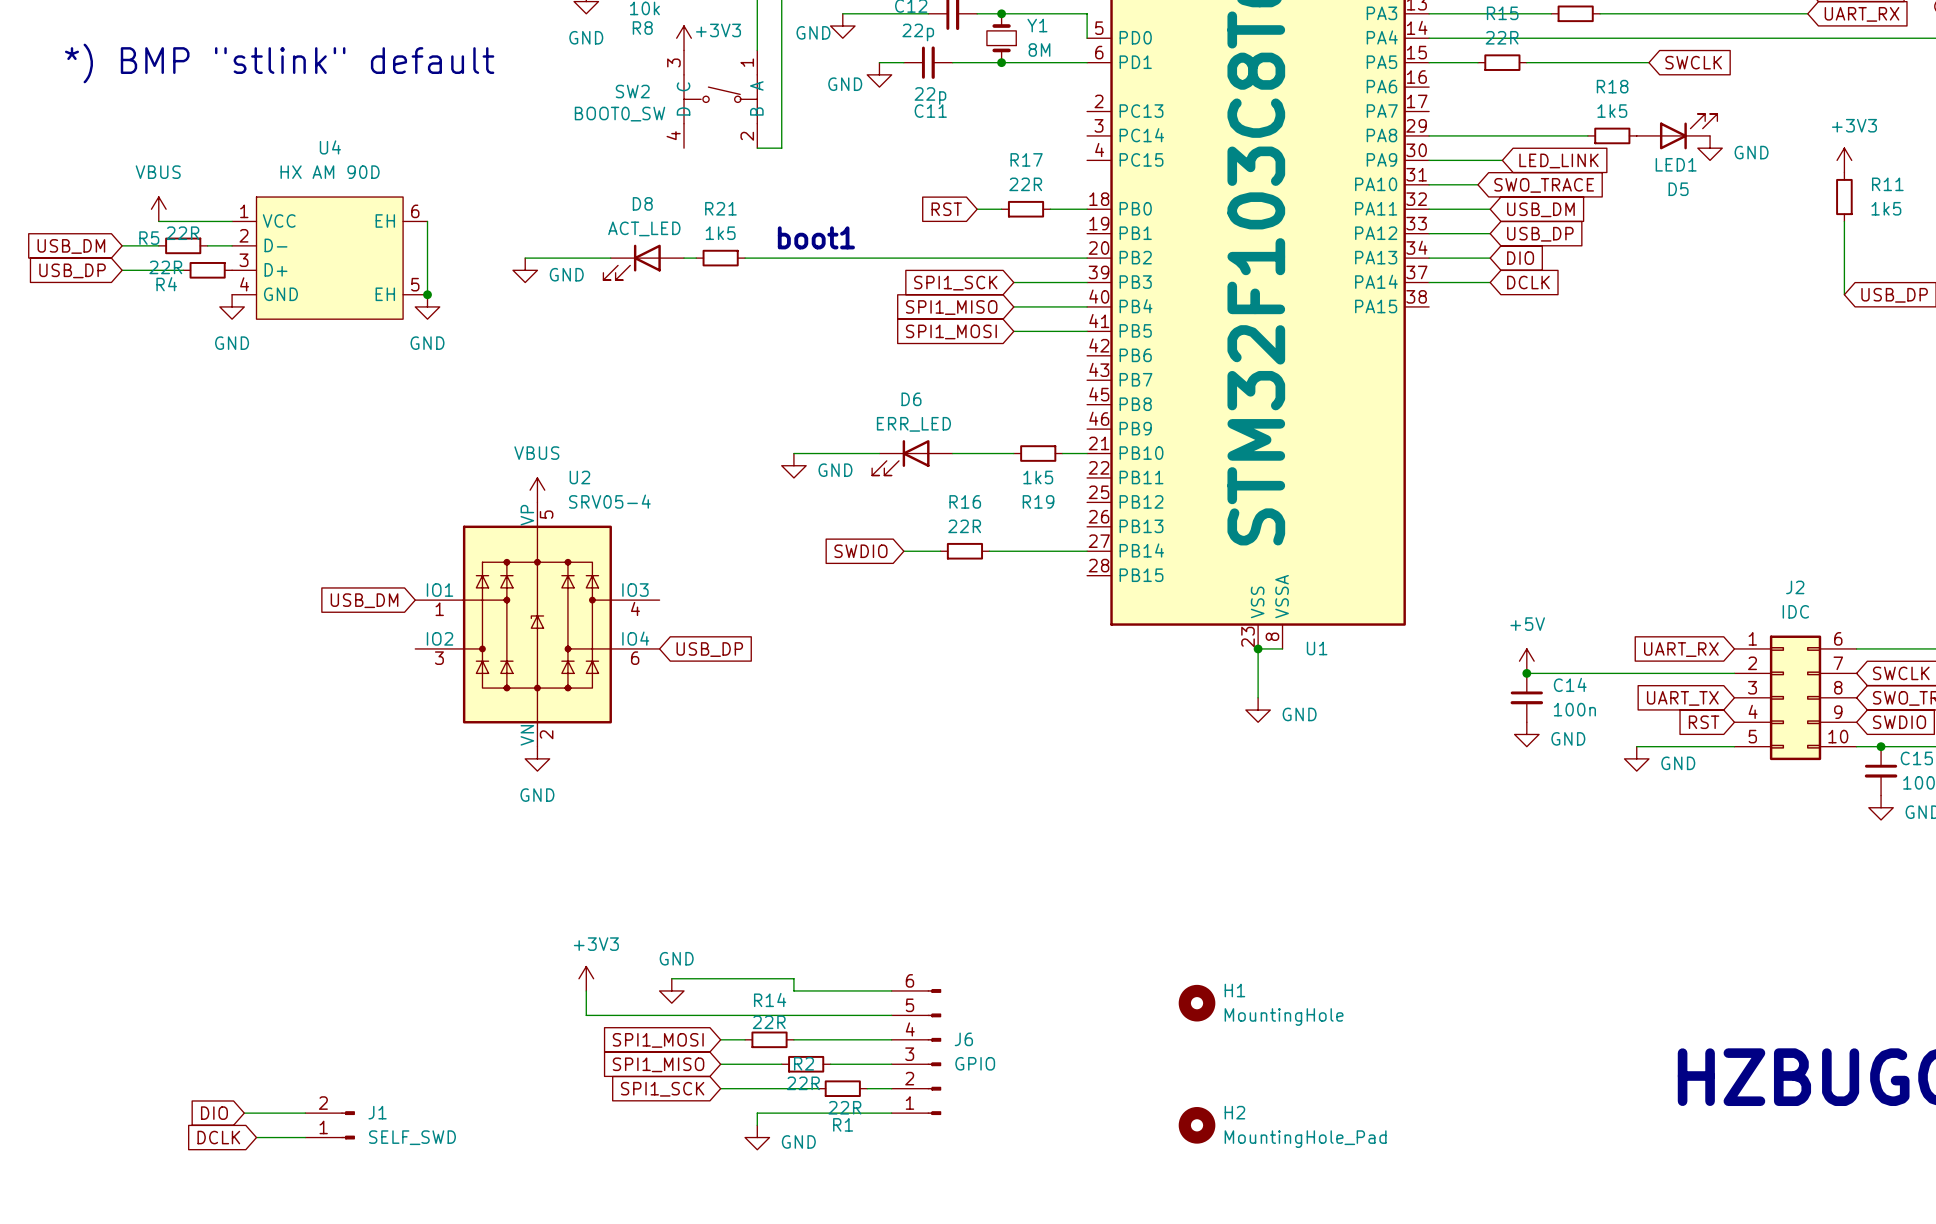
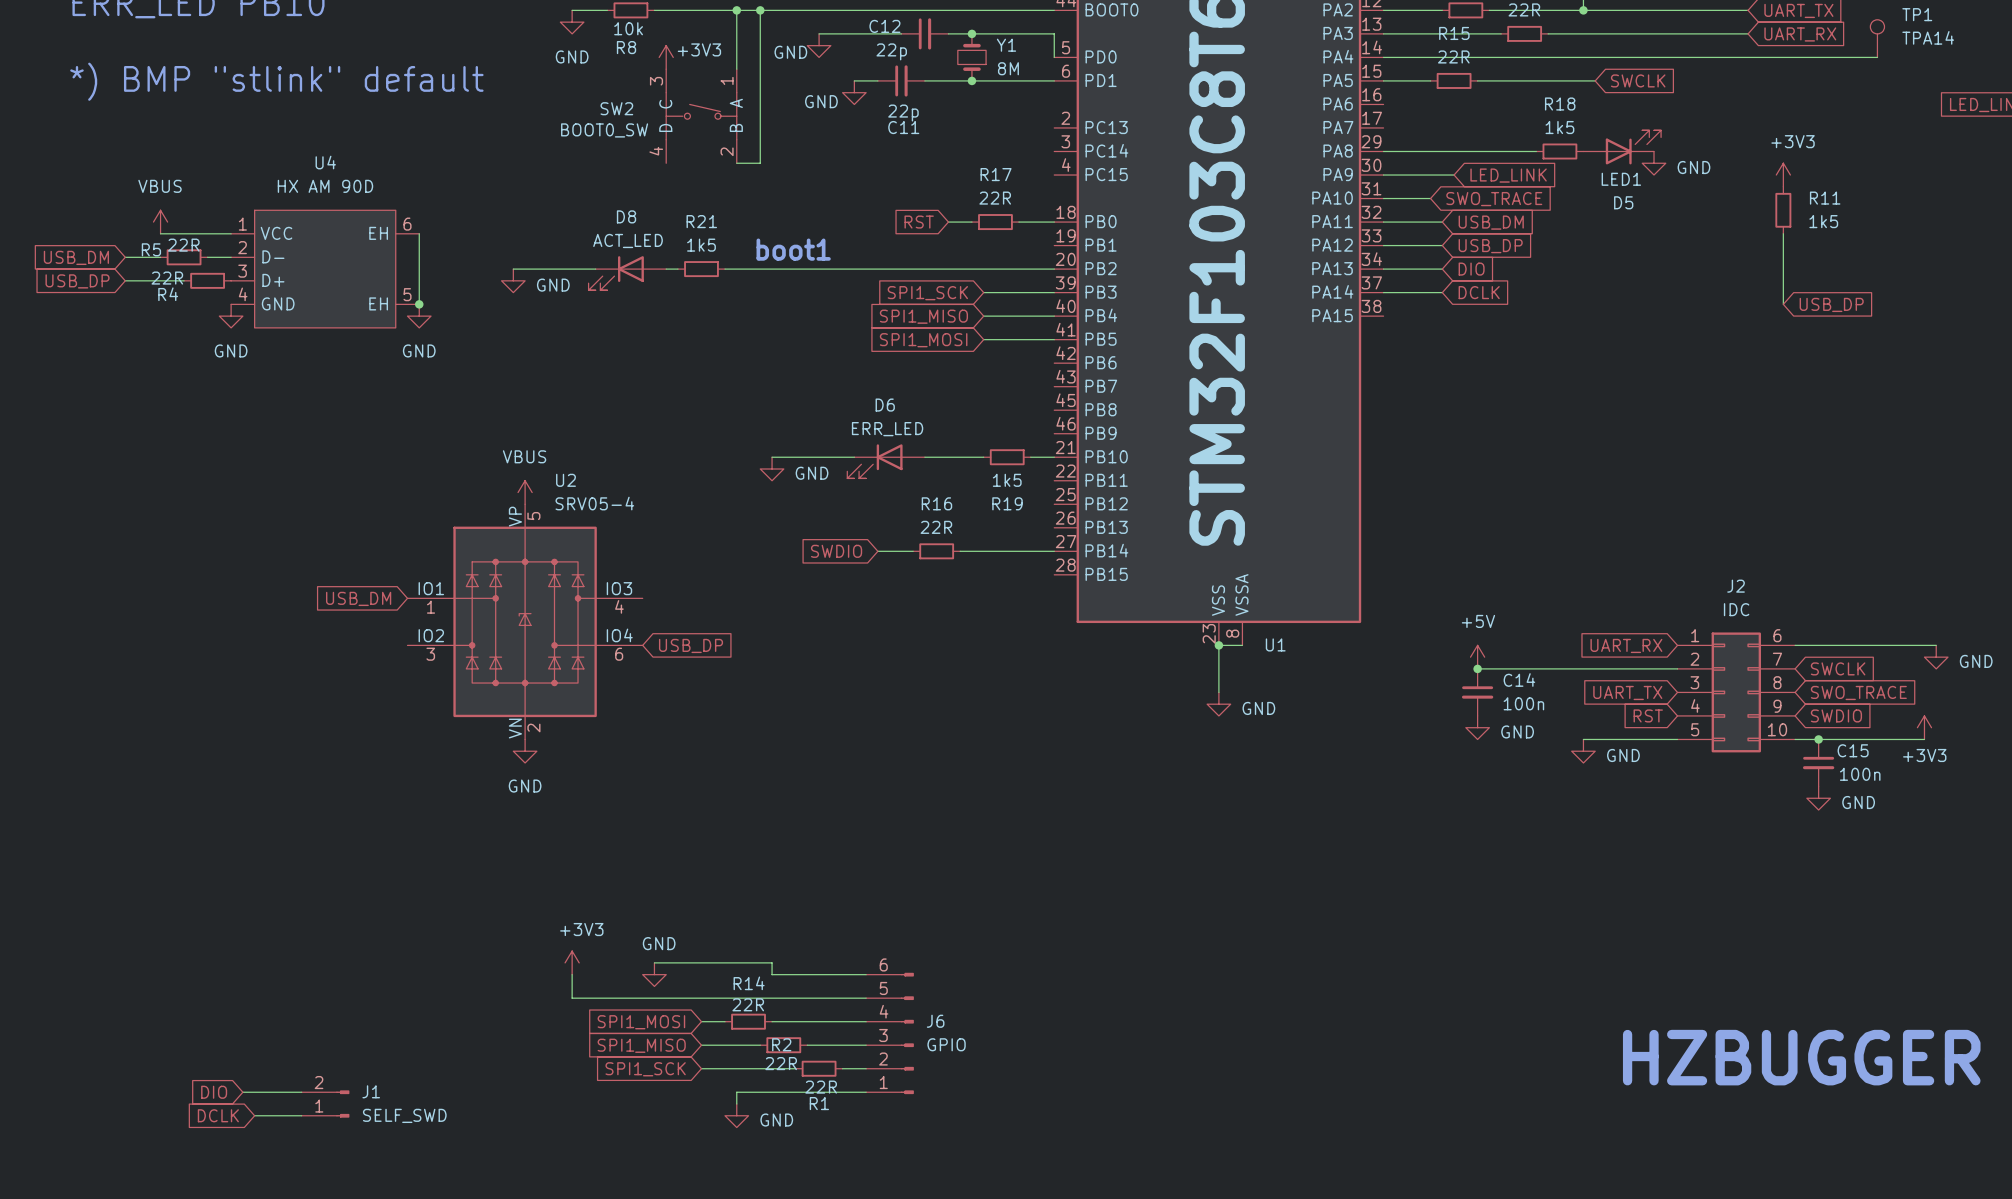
H1: MountingHole (1197, 1003) -> none
H2: MountingHole_Pad (1197, 1125) -> none

